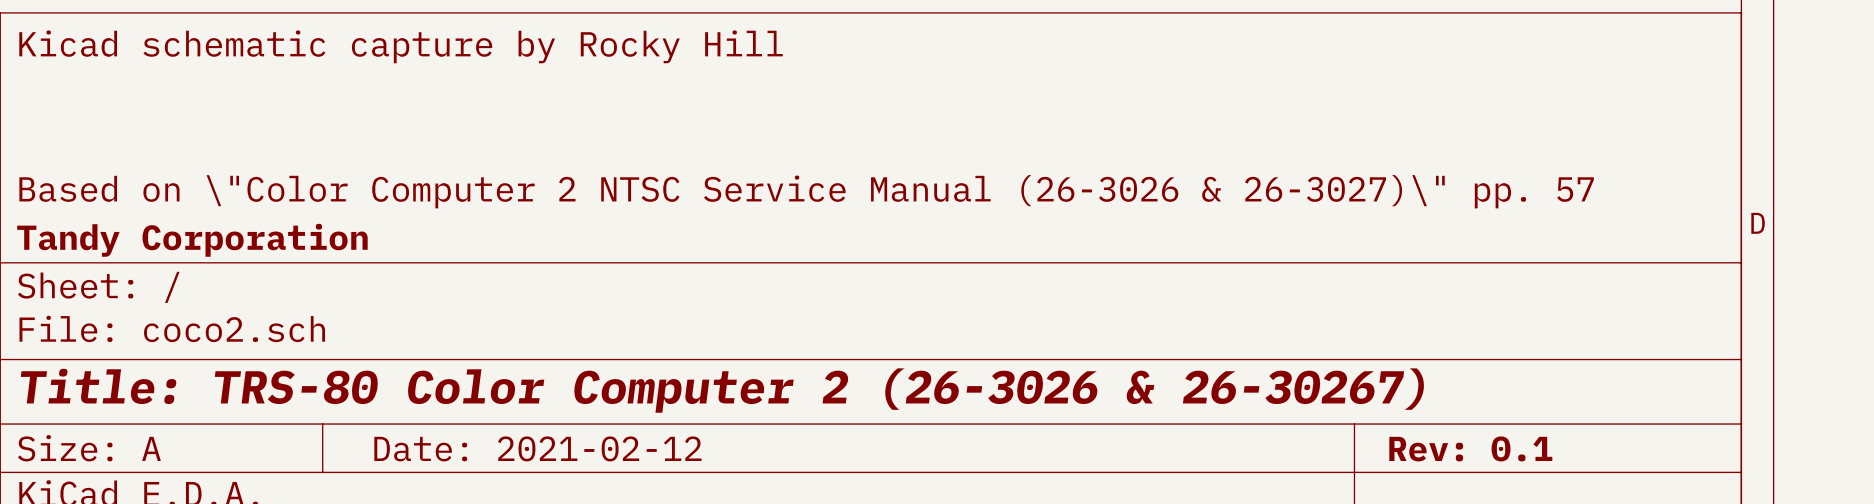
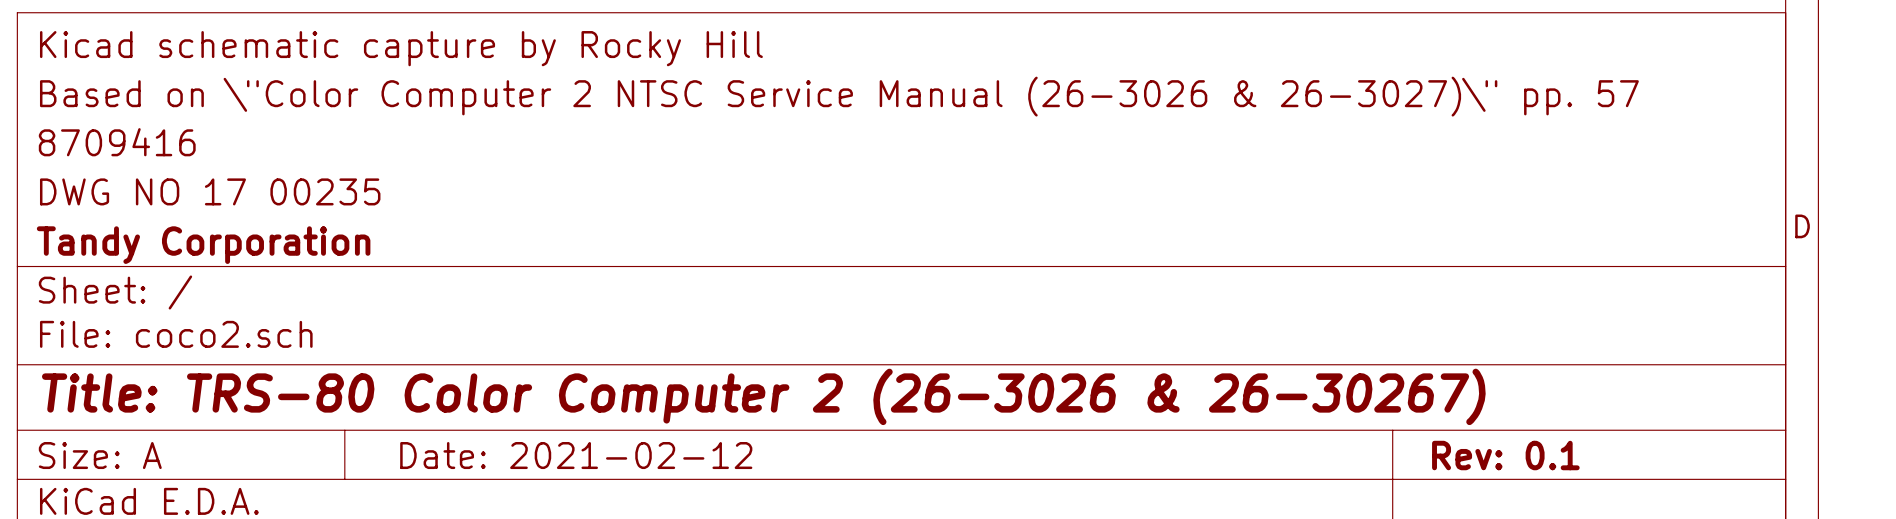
title block: none -> Based on \"Color Computer 2 NTSC Service Manual (26-3026 & 26-3027)\" pp. 57 (839, 96)
title block: none -> 8709416 (117, 142)
title block: Based on \"Color Computer 2 NTSC Service Manual (26-3026 & 26-3027)\" pp. 57 (806, 191) -> DWG NO 17 00235 (210, 191)

